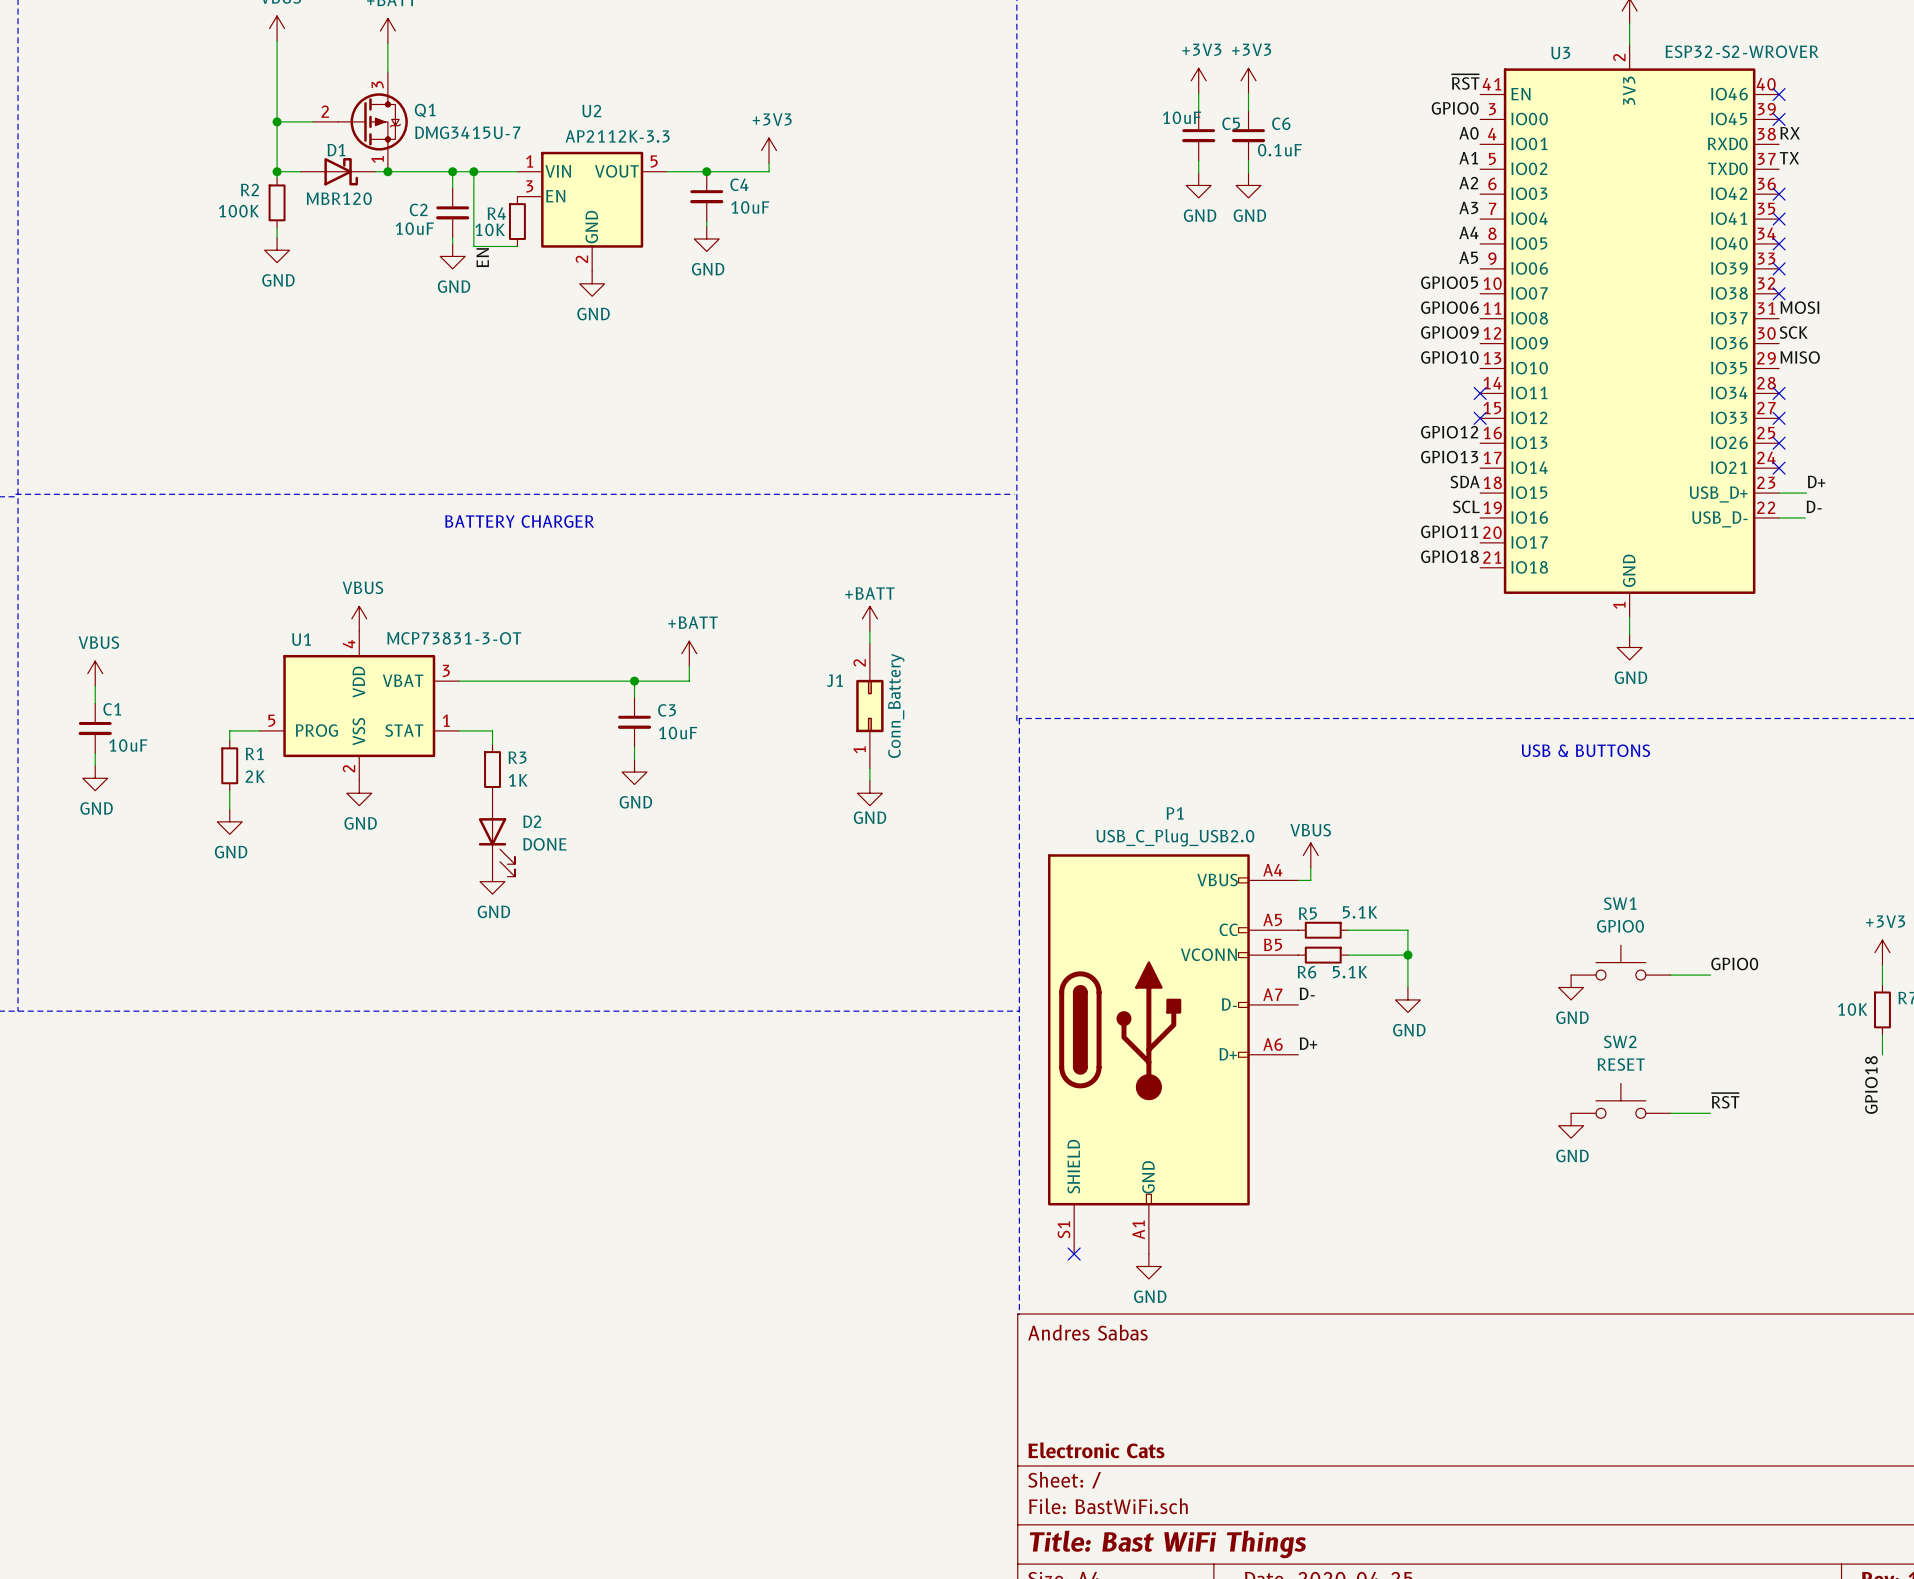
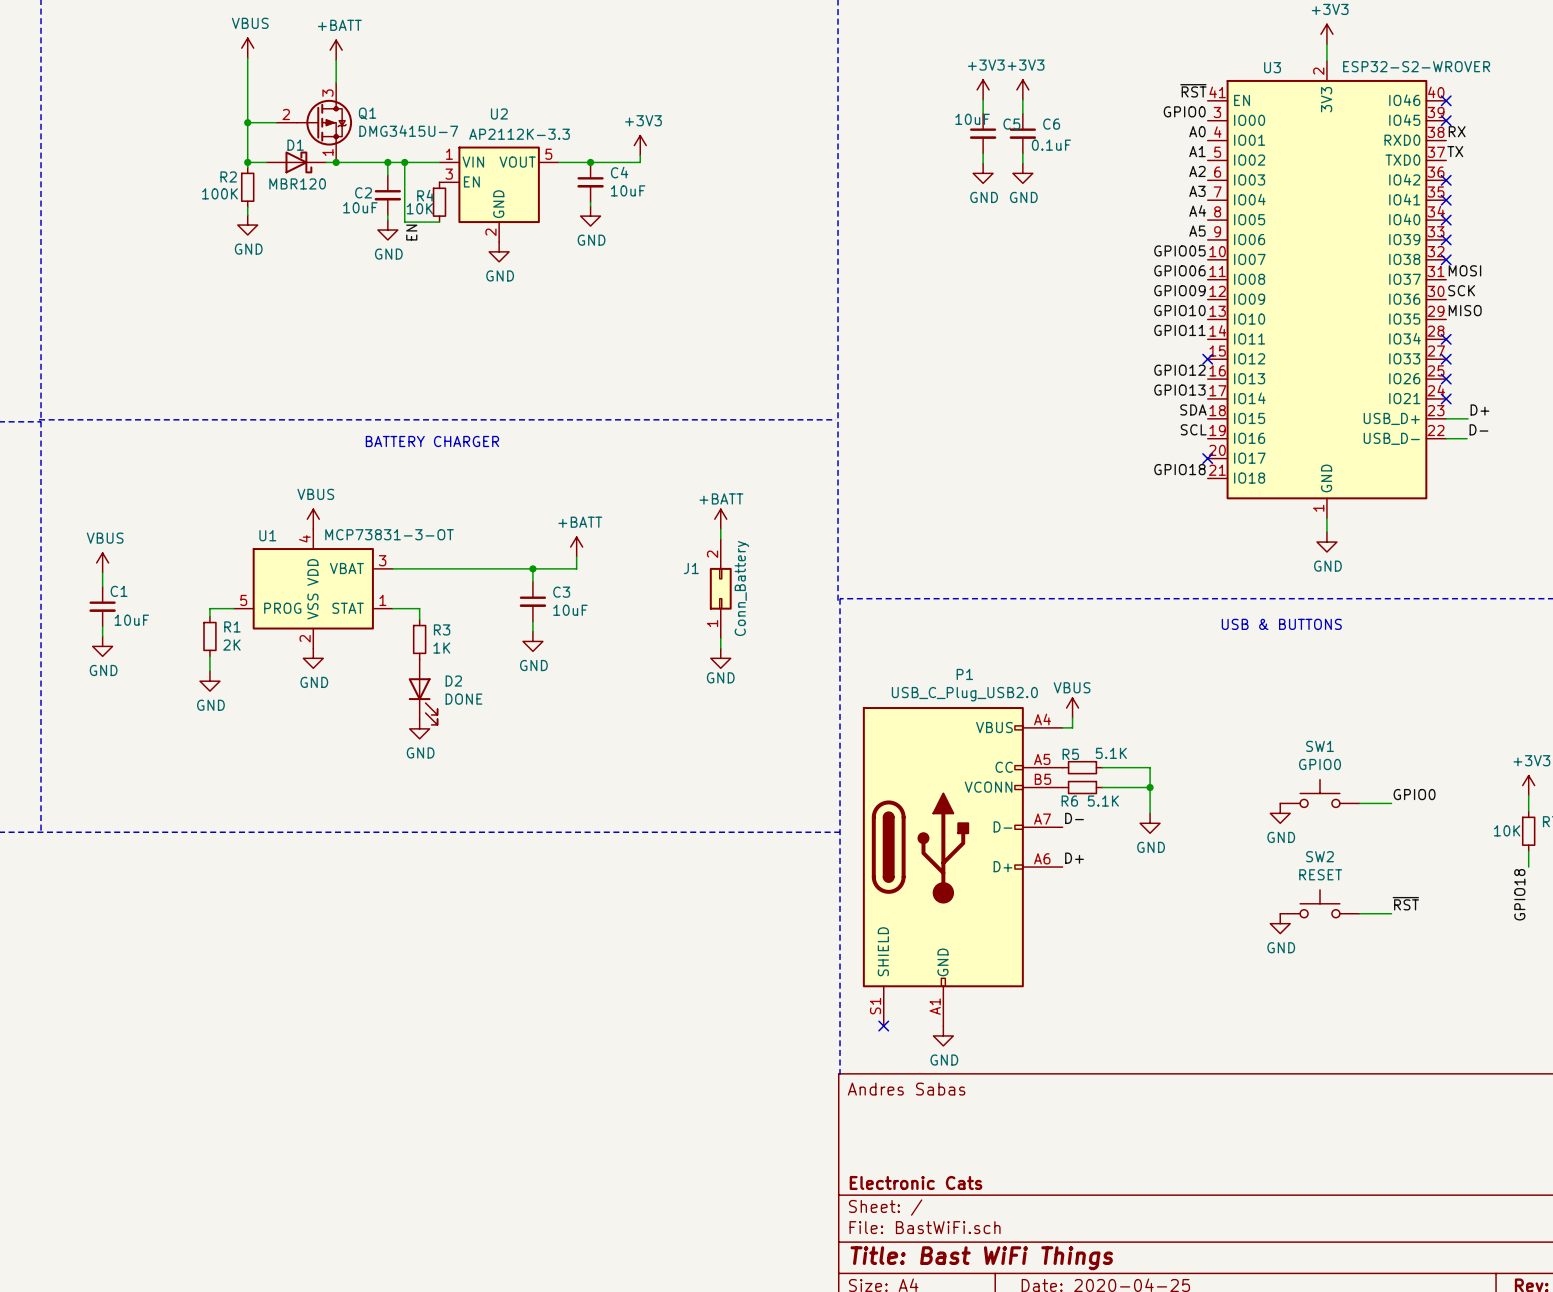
no-connect mark: (1480, 393) -> none
label position: GPIO11 (1449, 531) -> GPIO11 (1179, 330)
no-connect mark: none -> (1207, 458)

